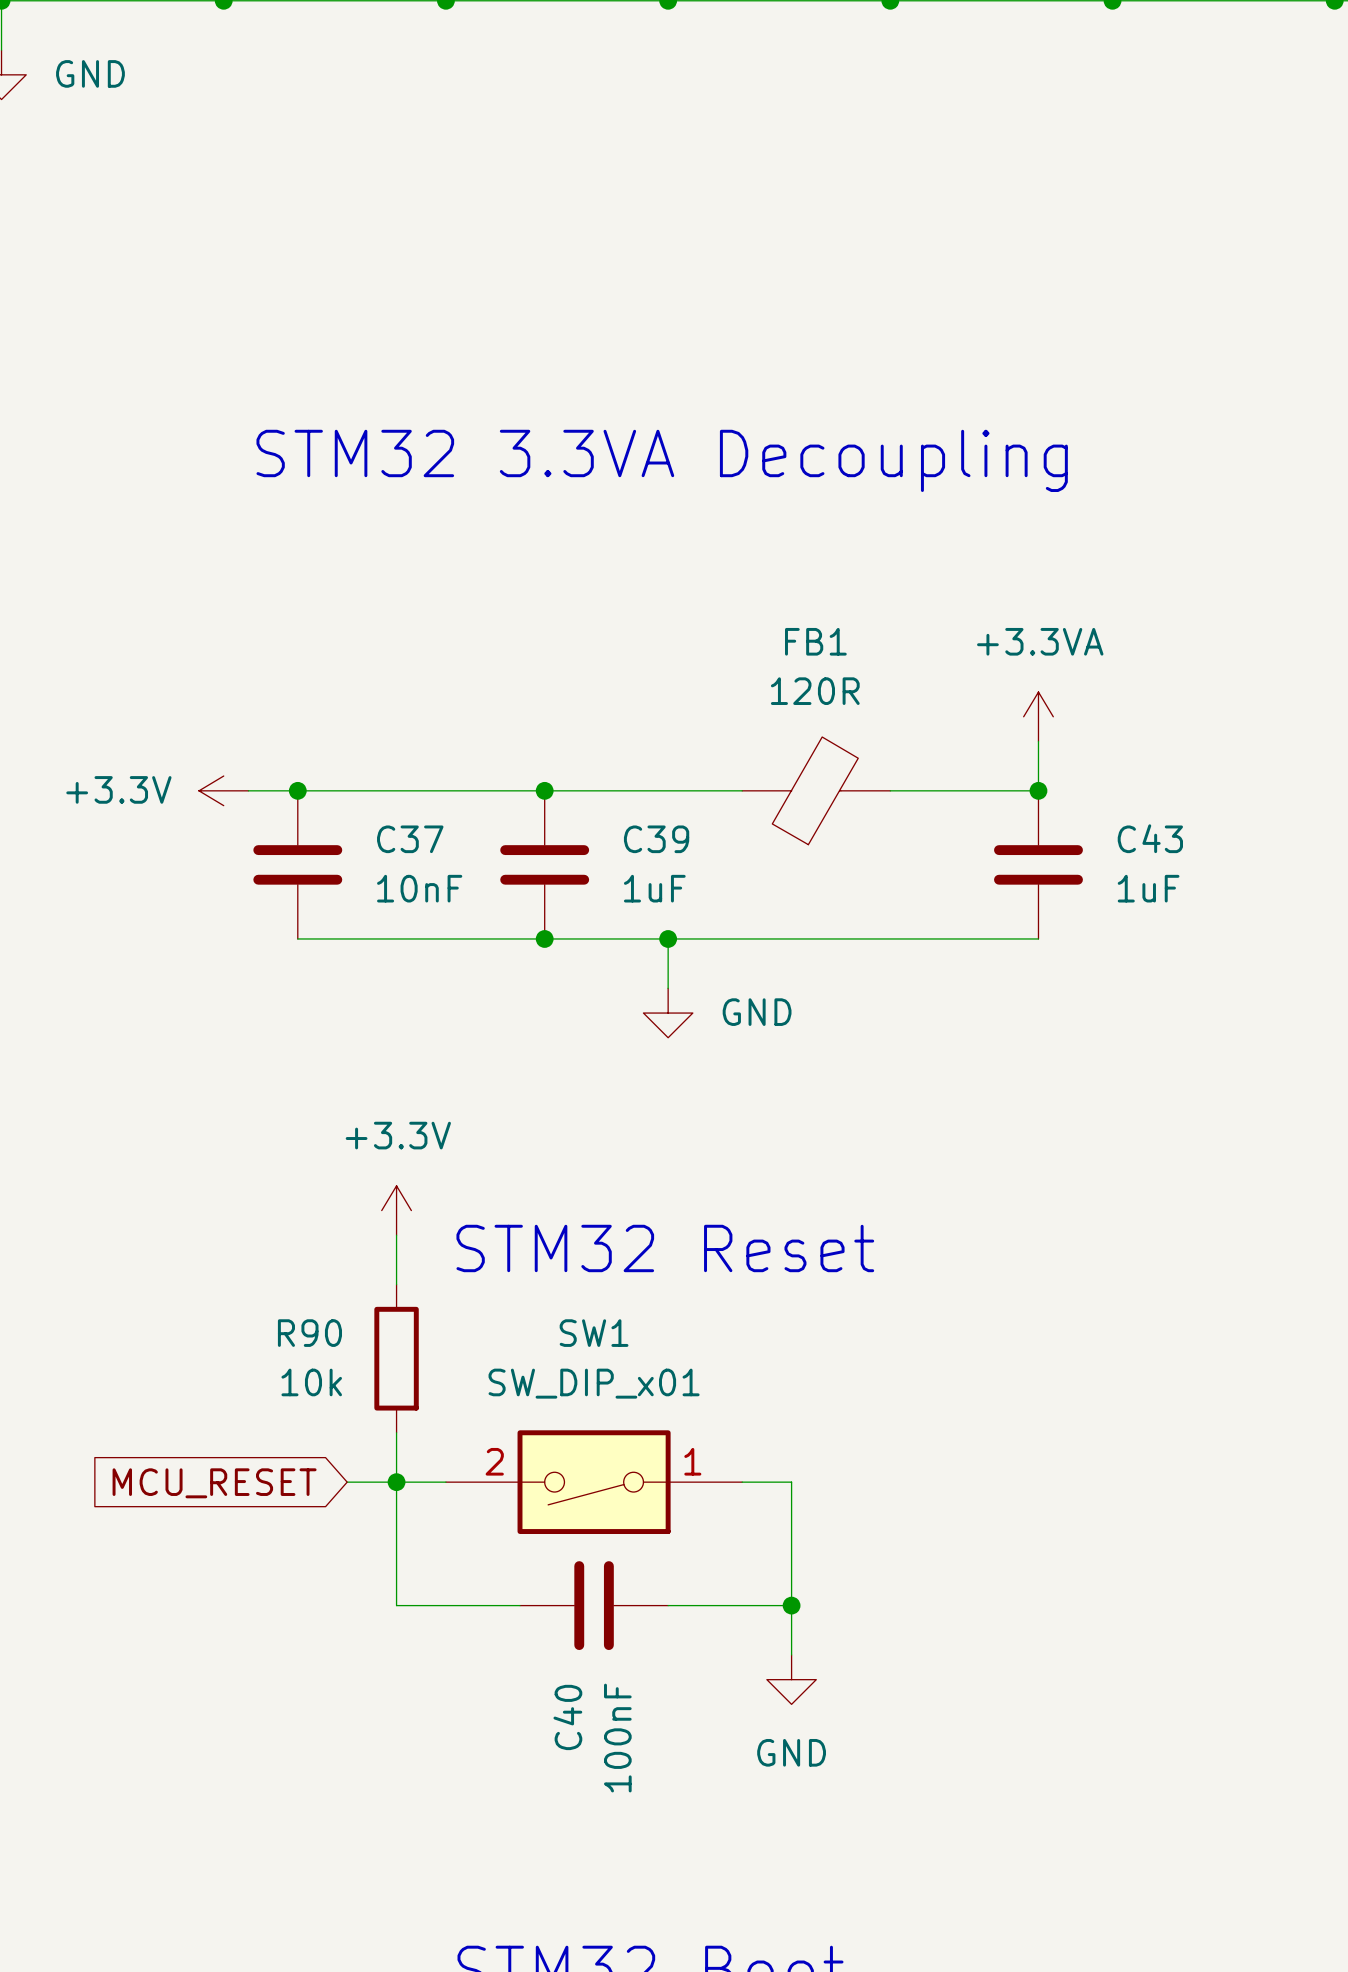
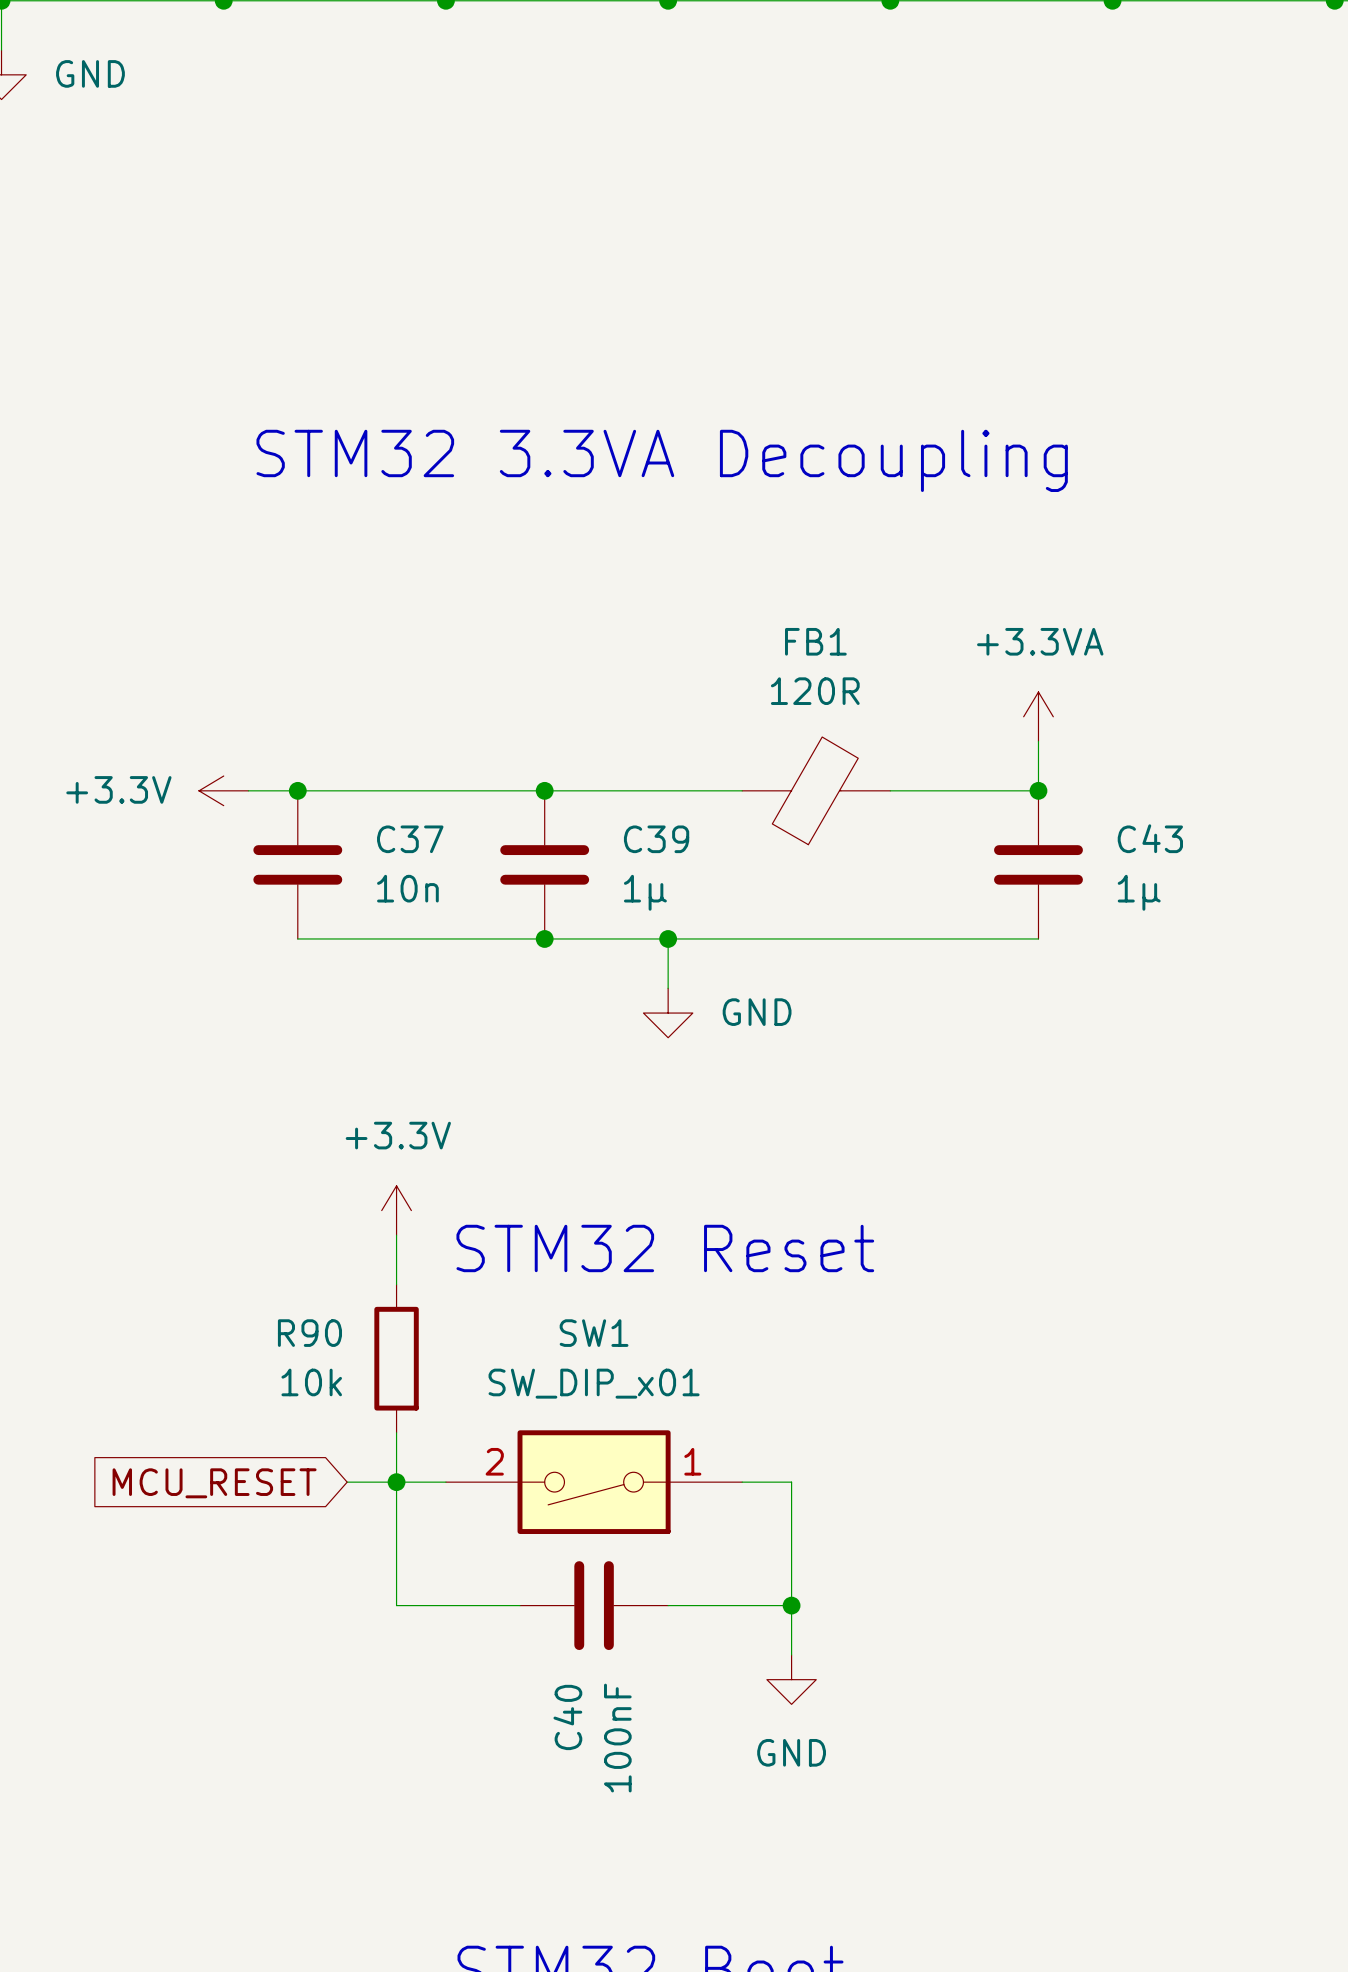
C37 value: 10nF (419, 888) -> 10n (407, 888)
C39 value: 1uF (654, 888) -> 1µ (645, 892)
C43 value: 1uF (1148, 888) -> 1µ (1139, 892)

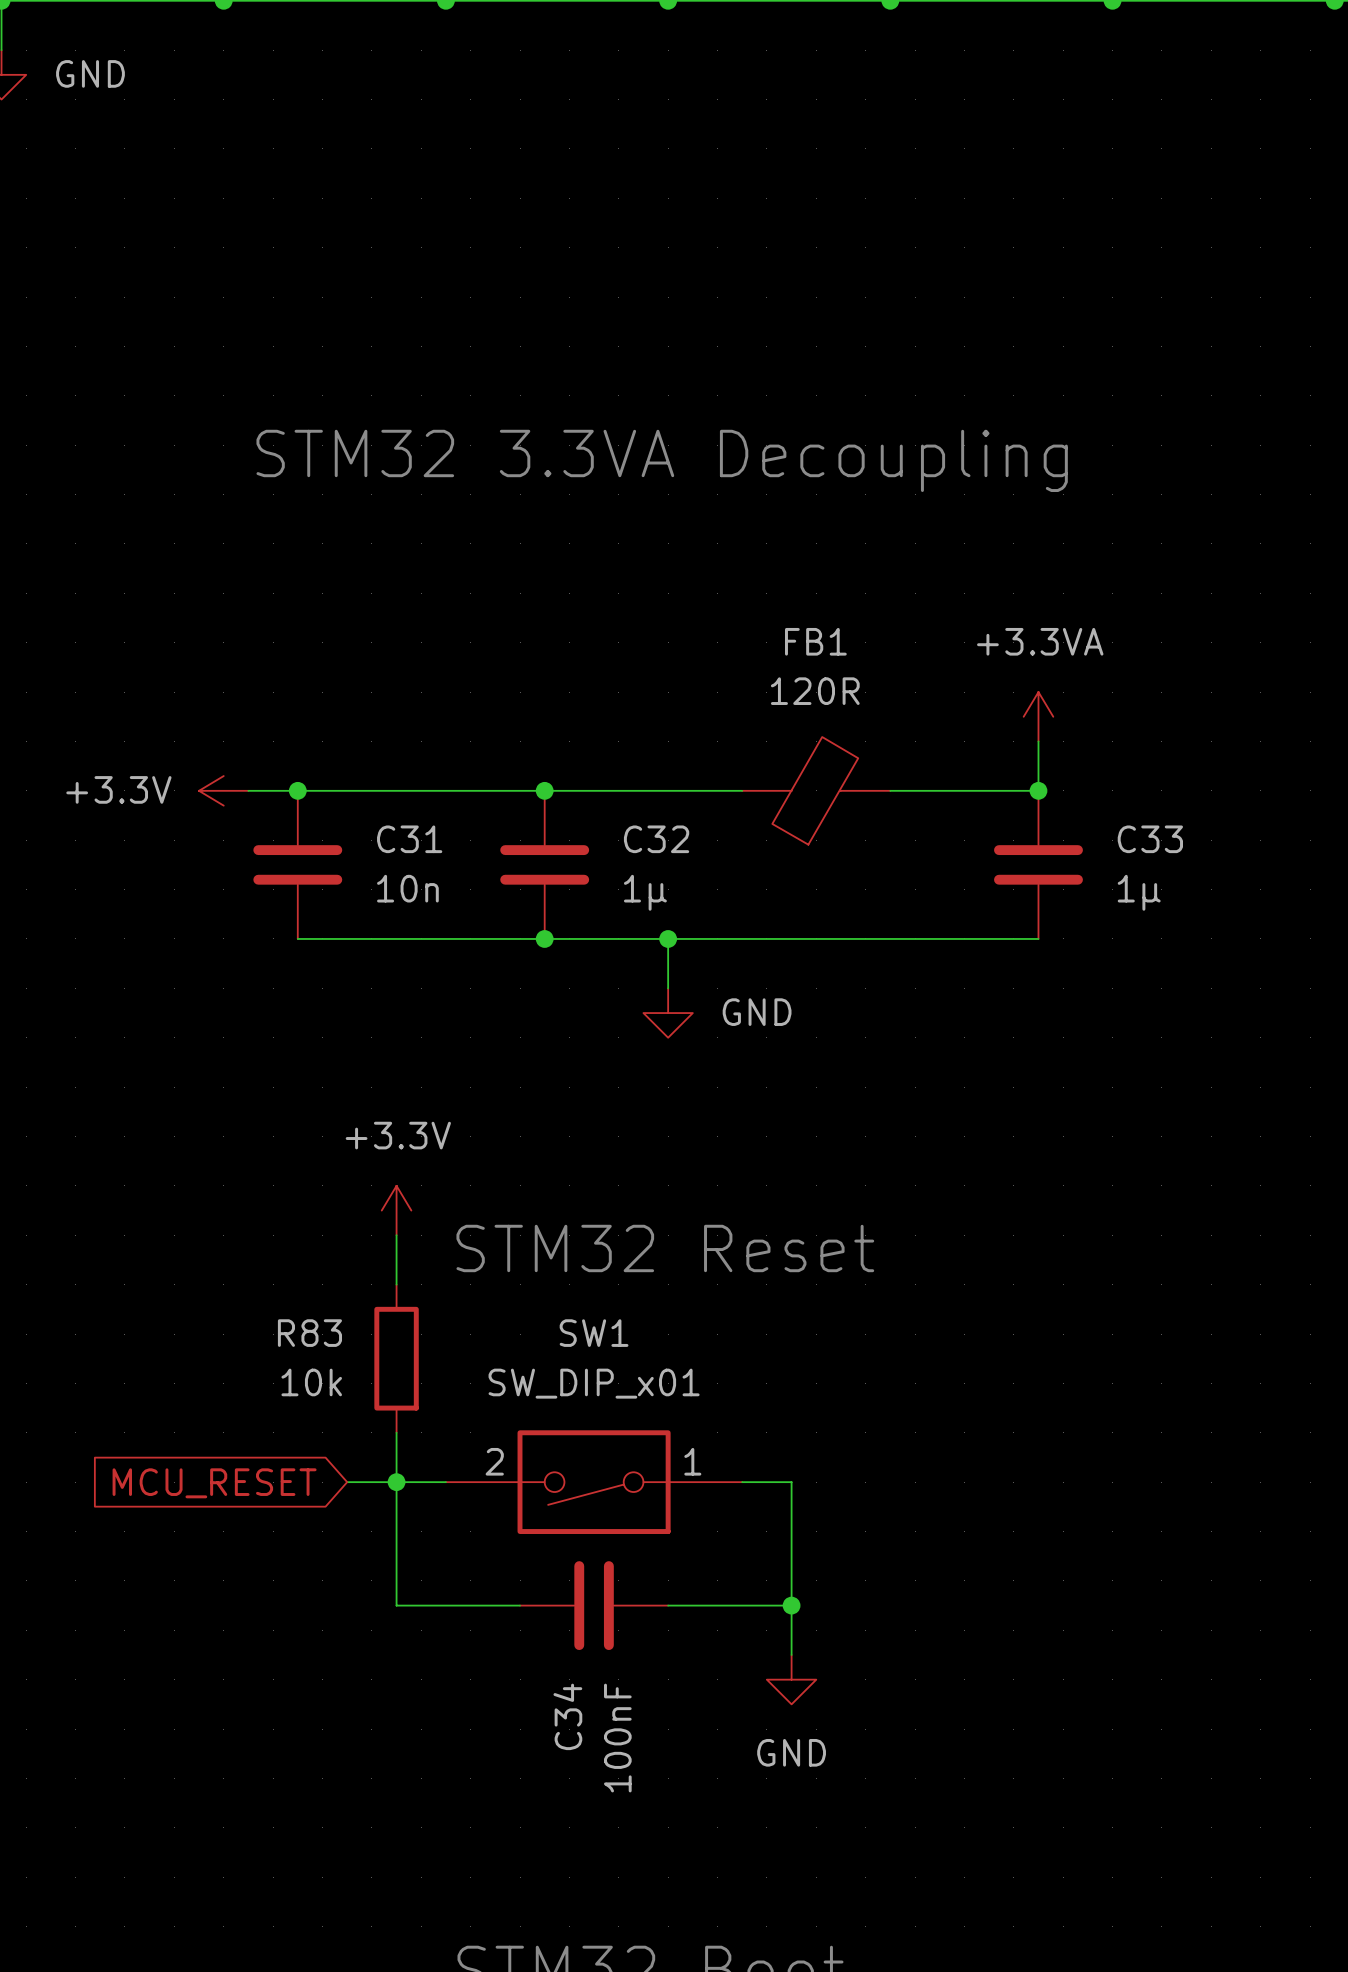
C43 name: C43 (1150, 838) -> C33 (1150, 839)
C37 name: C37 (410, 839) -> C31 (409, 839)
C39 name: C39 (656, 839) -> C32 (656, 839)
R90 name: R90 (309, 1333) -> R83 (309, 1333)
C40 name: C40 (567, 1717) -> C34 (567, 1716)

